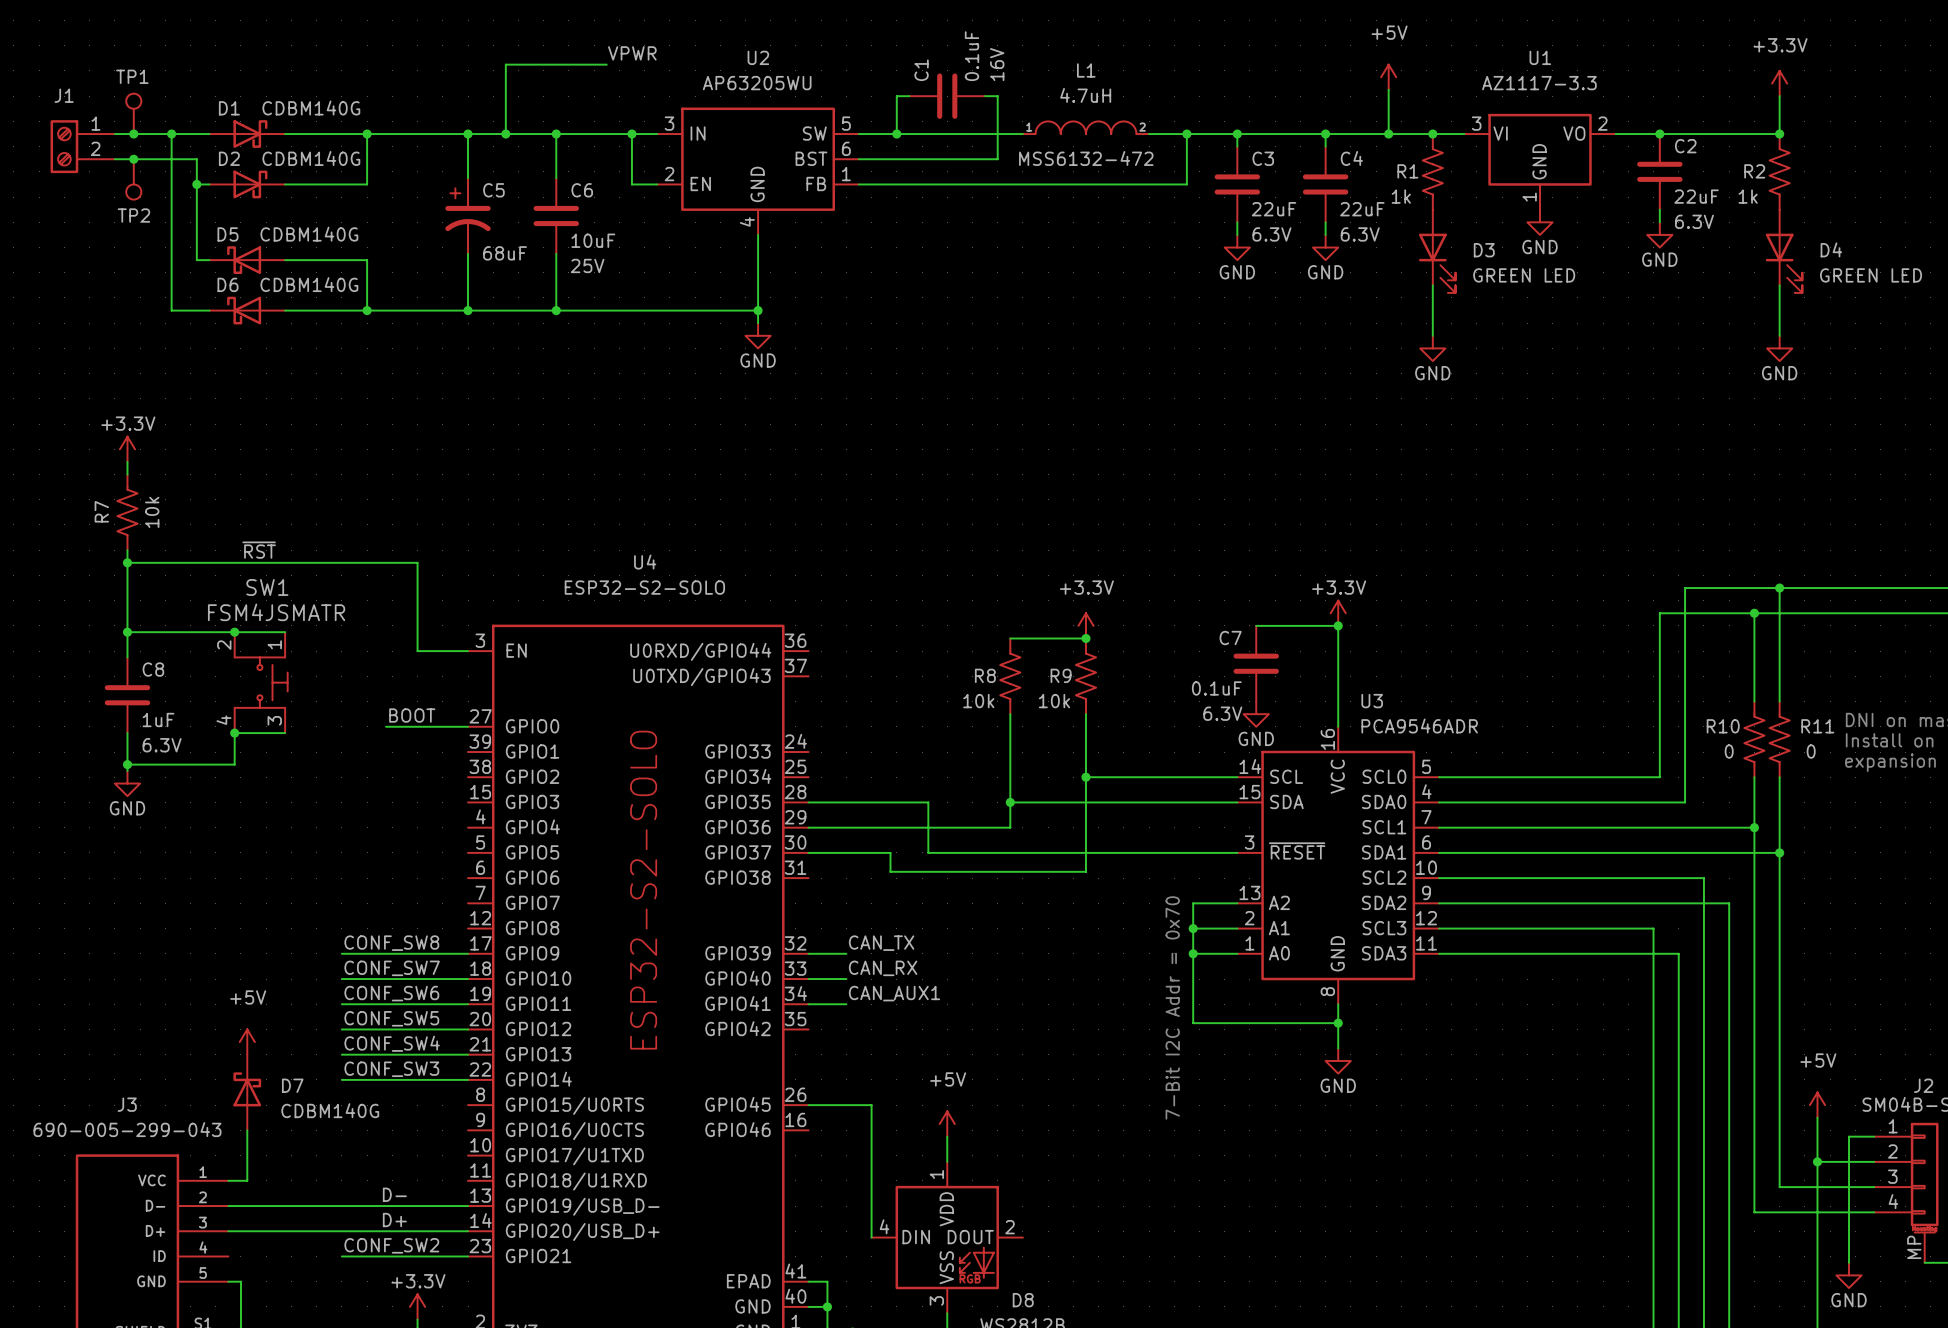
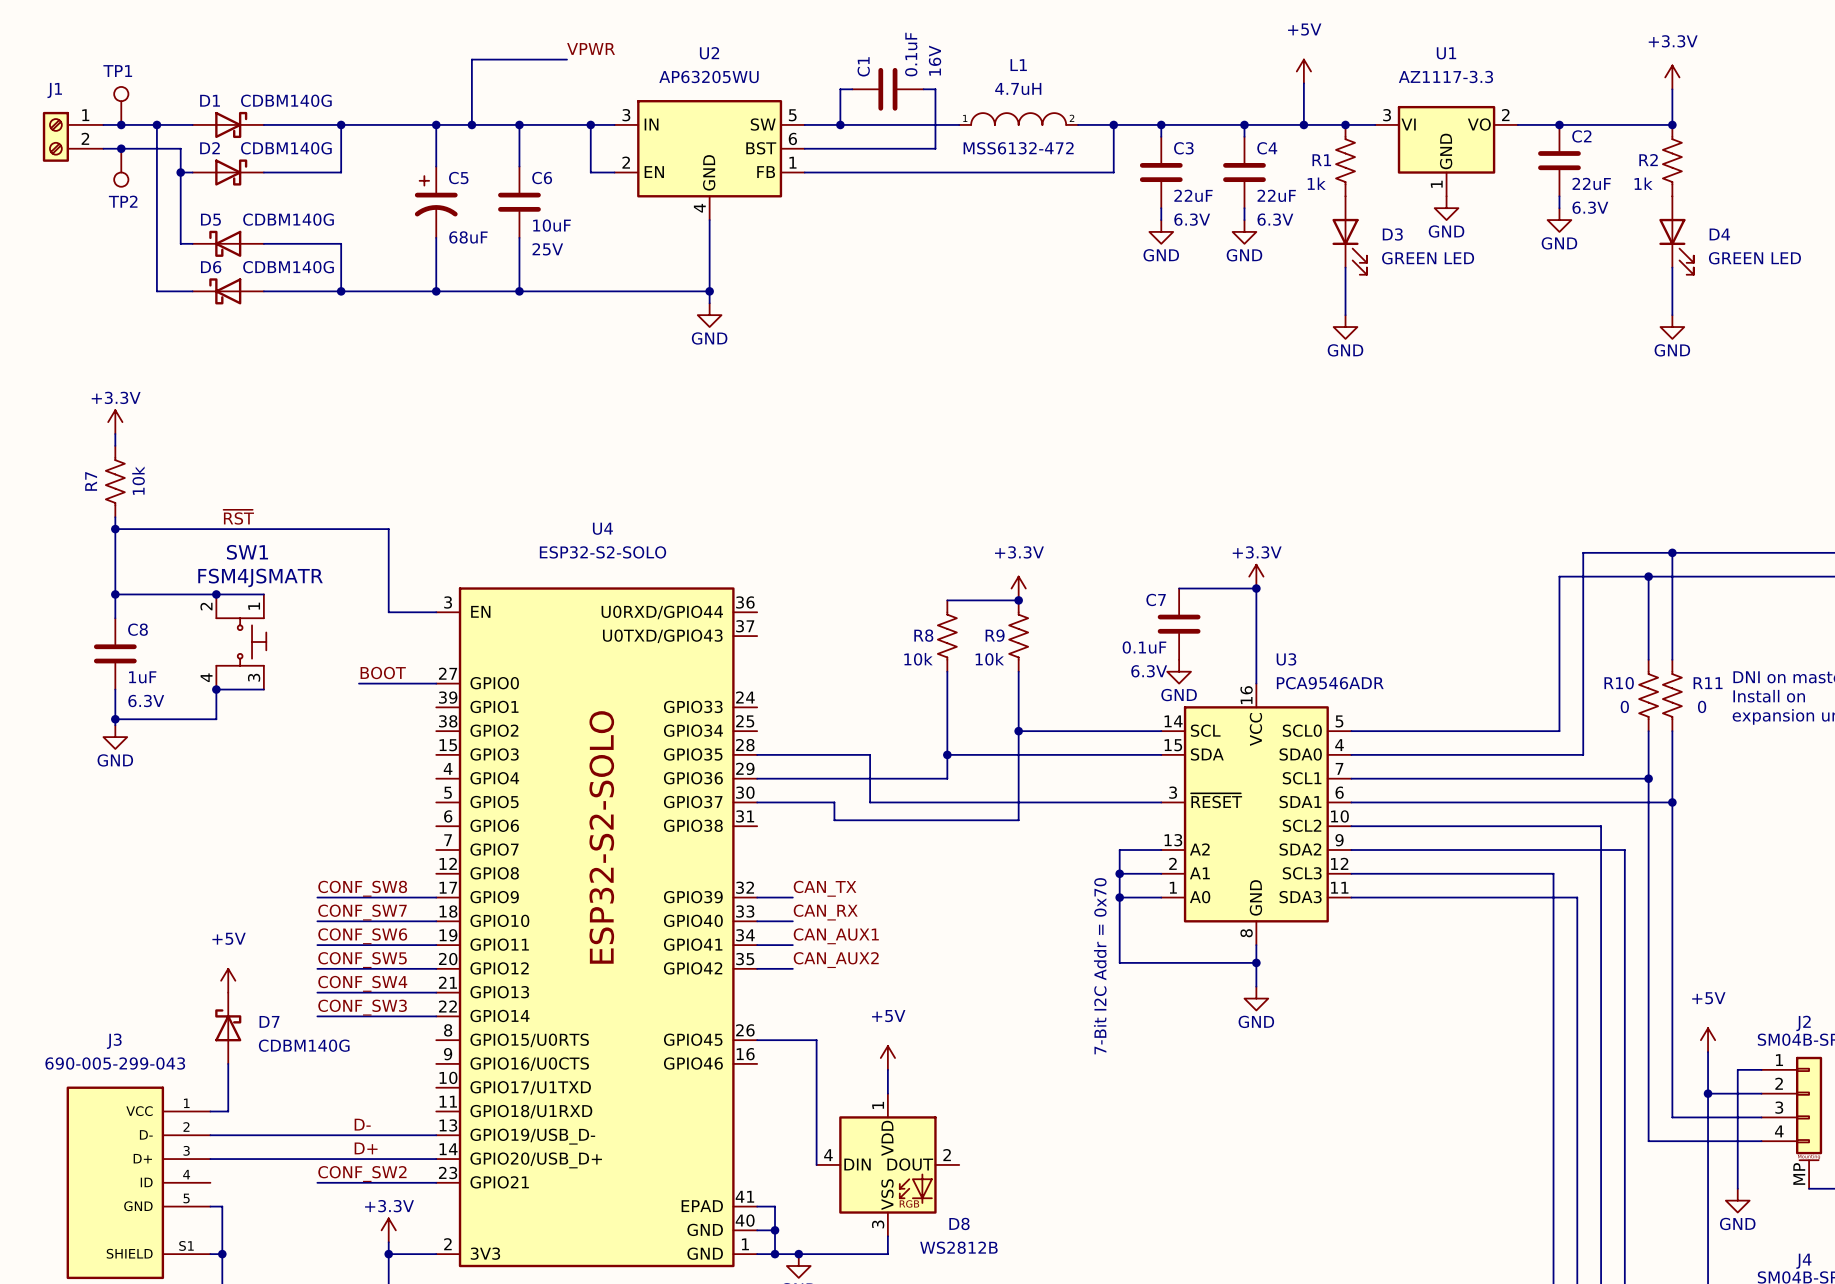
label: none -> CAN_AUX2 (836, 960)
wire: none -> (757, 968) (792, 968)

